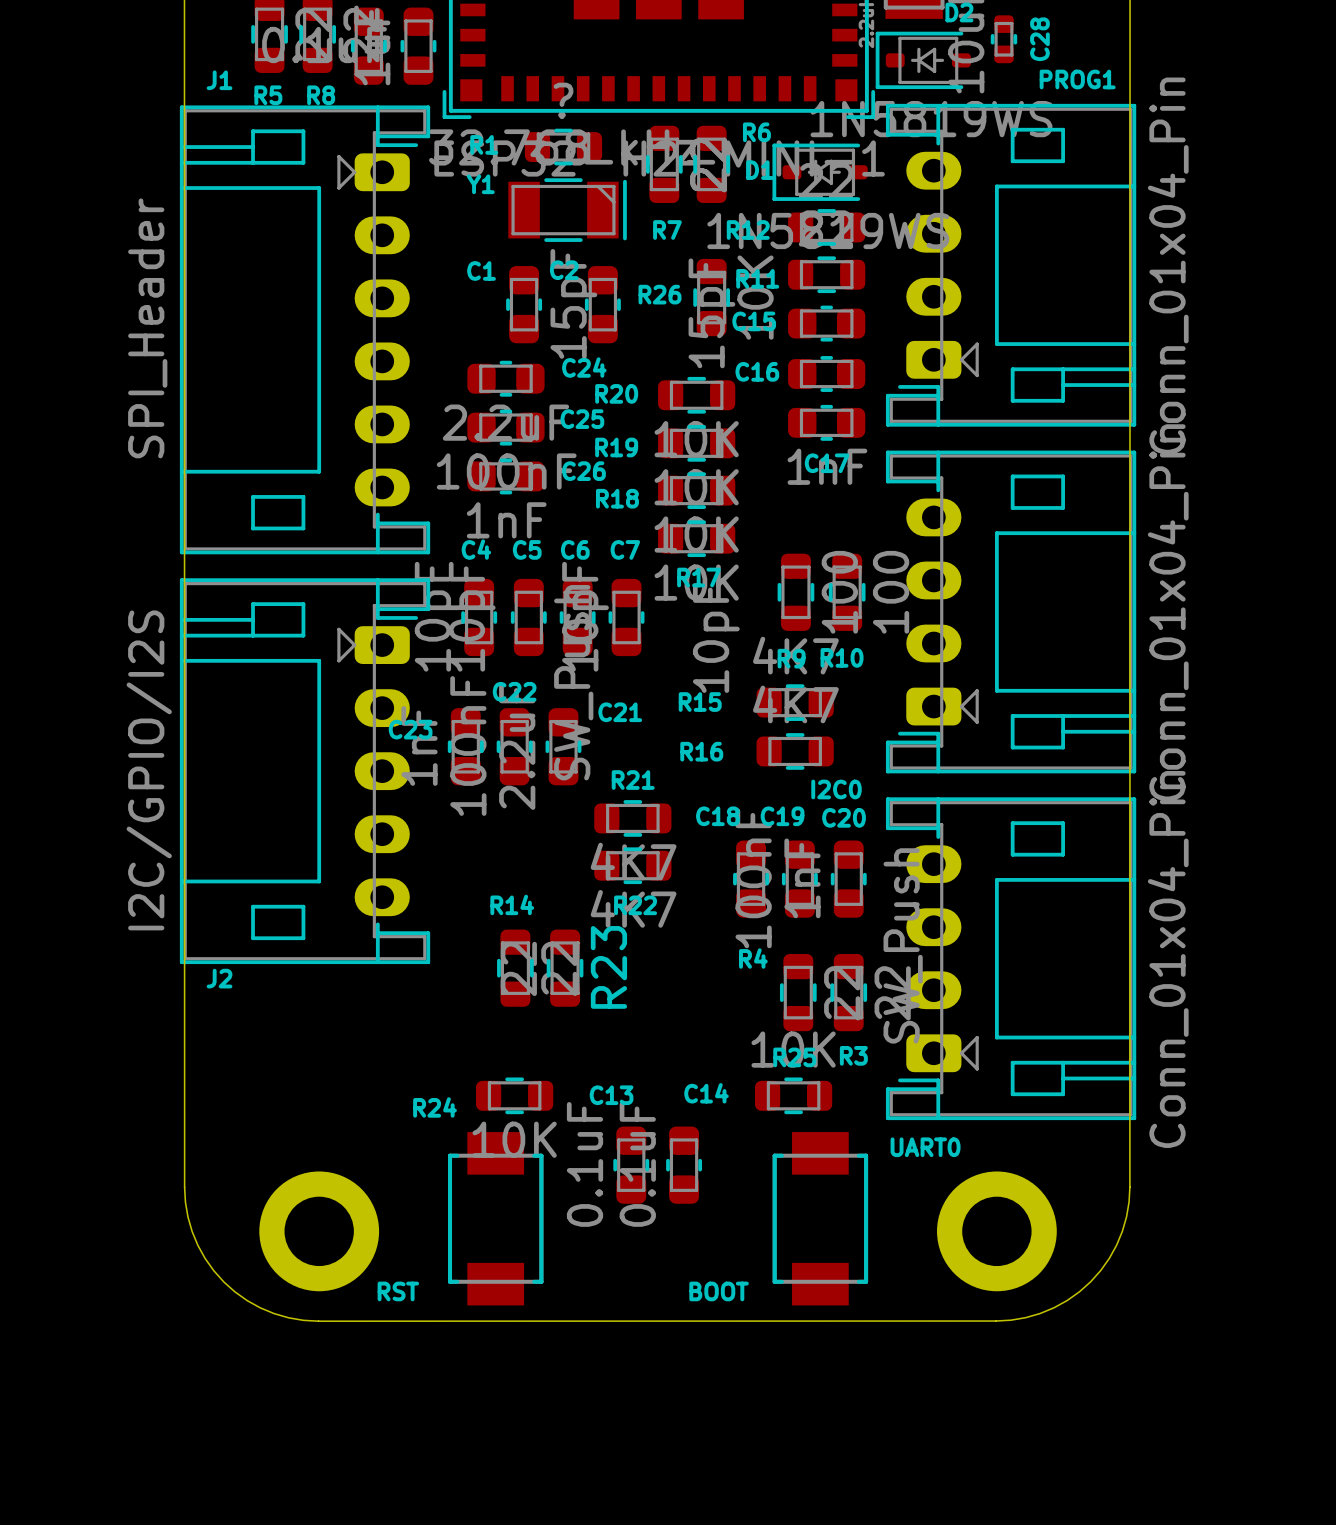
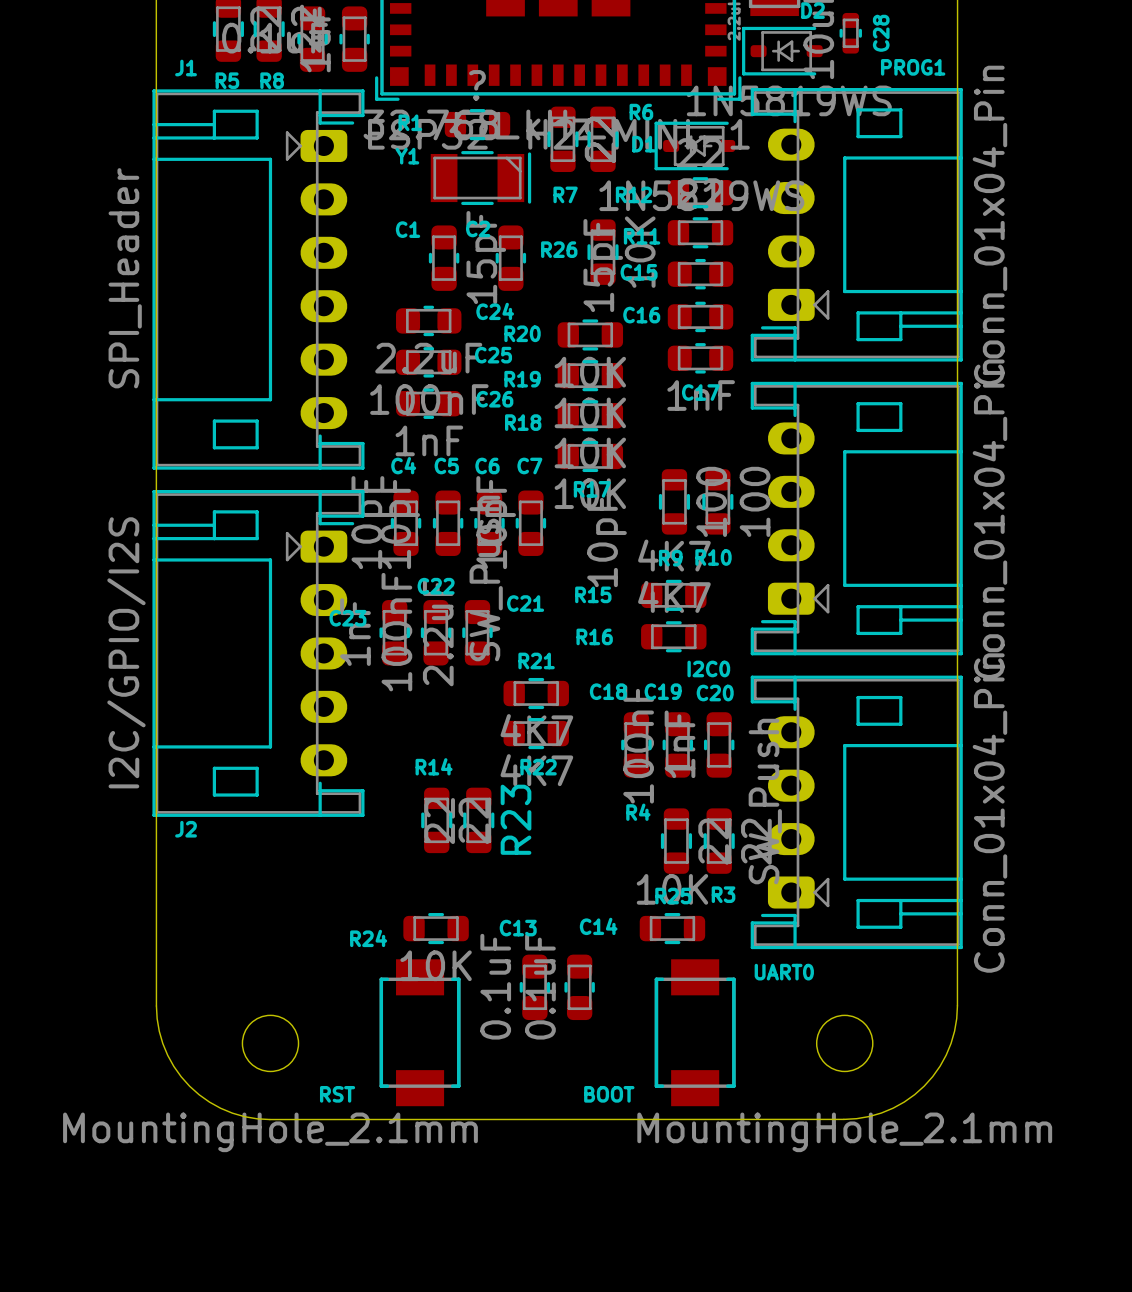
part footprint: [259, 1171, 380, 1292] -> [242, 1015, 299, 1072]
part footprint: [937, 1171, 1057, 1292] -> [816, 1015, 873, 1072]
part value: none -> MountingHole_2.1mm (270, 1132)
part value: none -> MountingHole_2.1mm (844, 1132)

